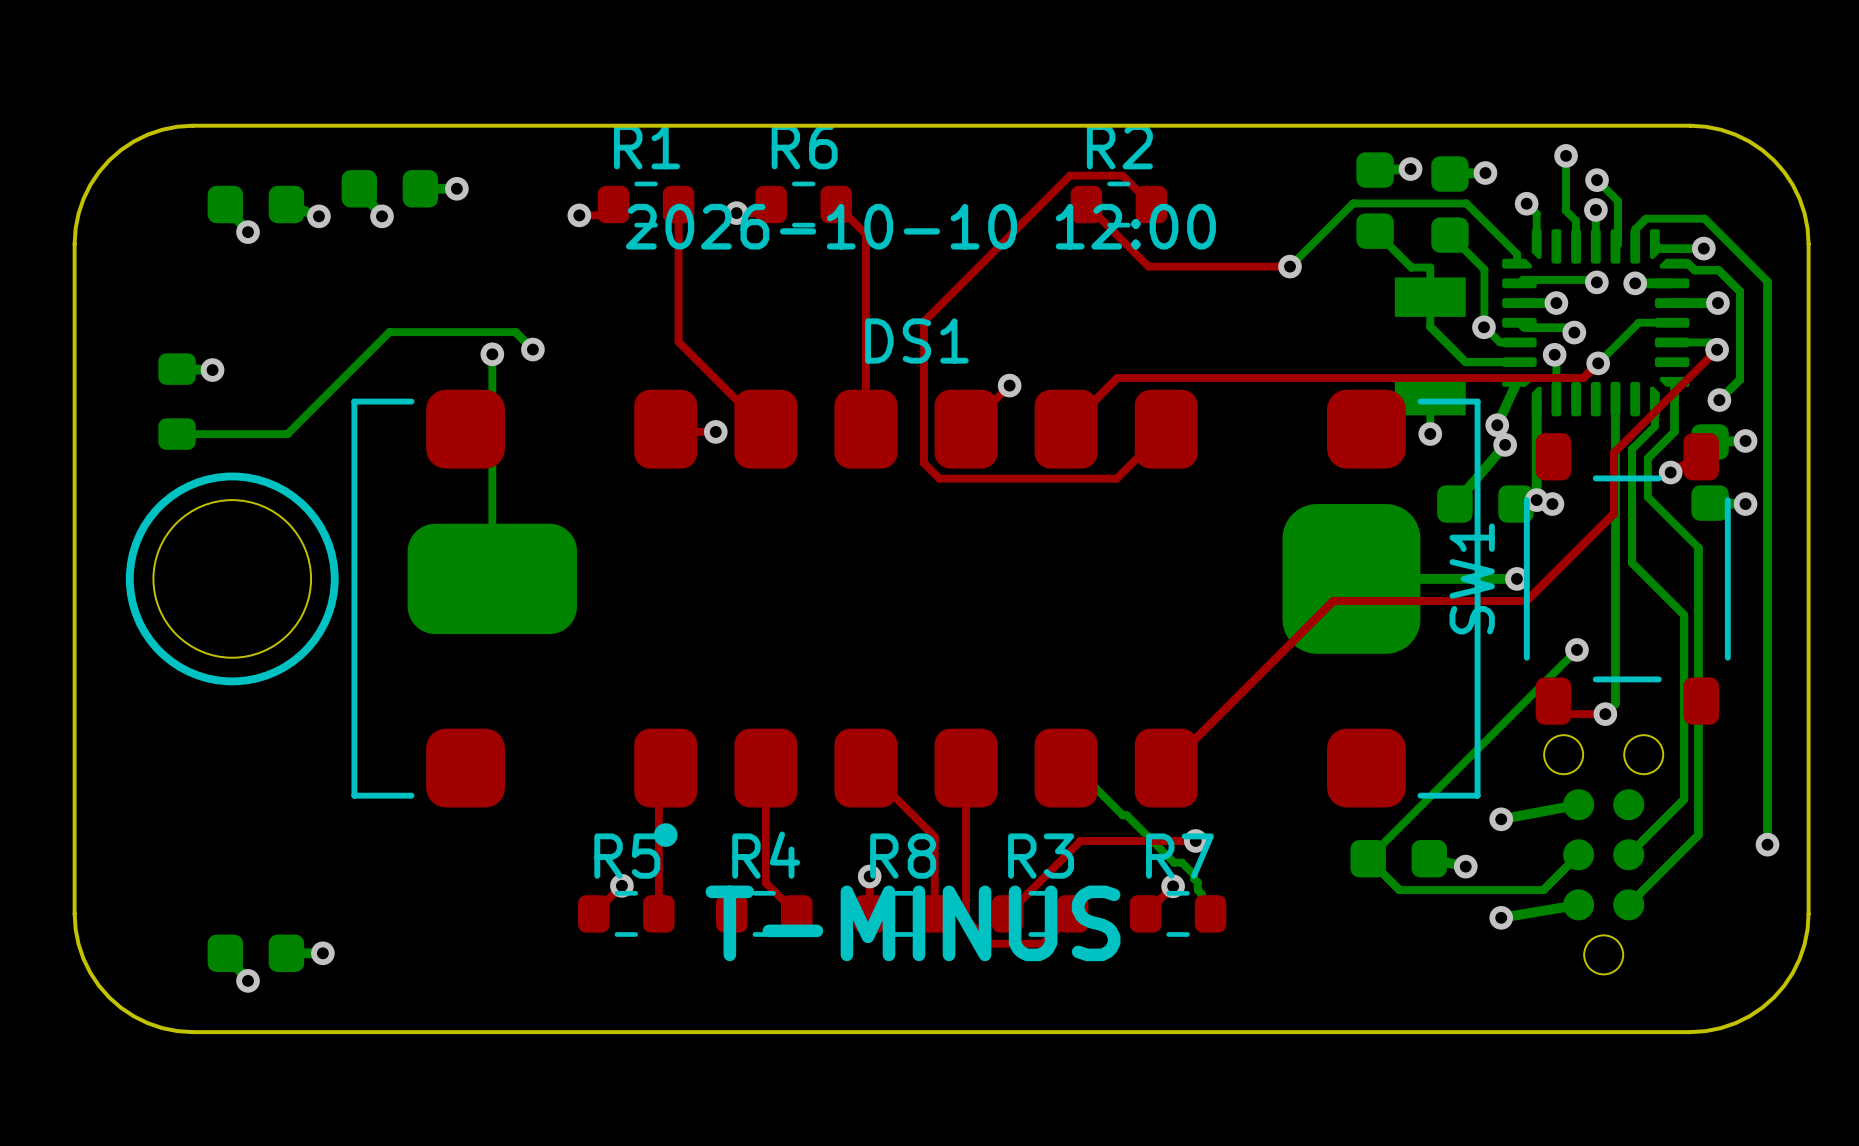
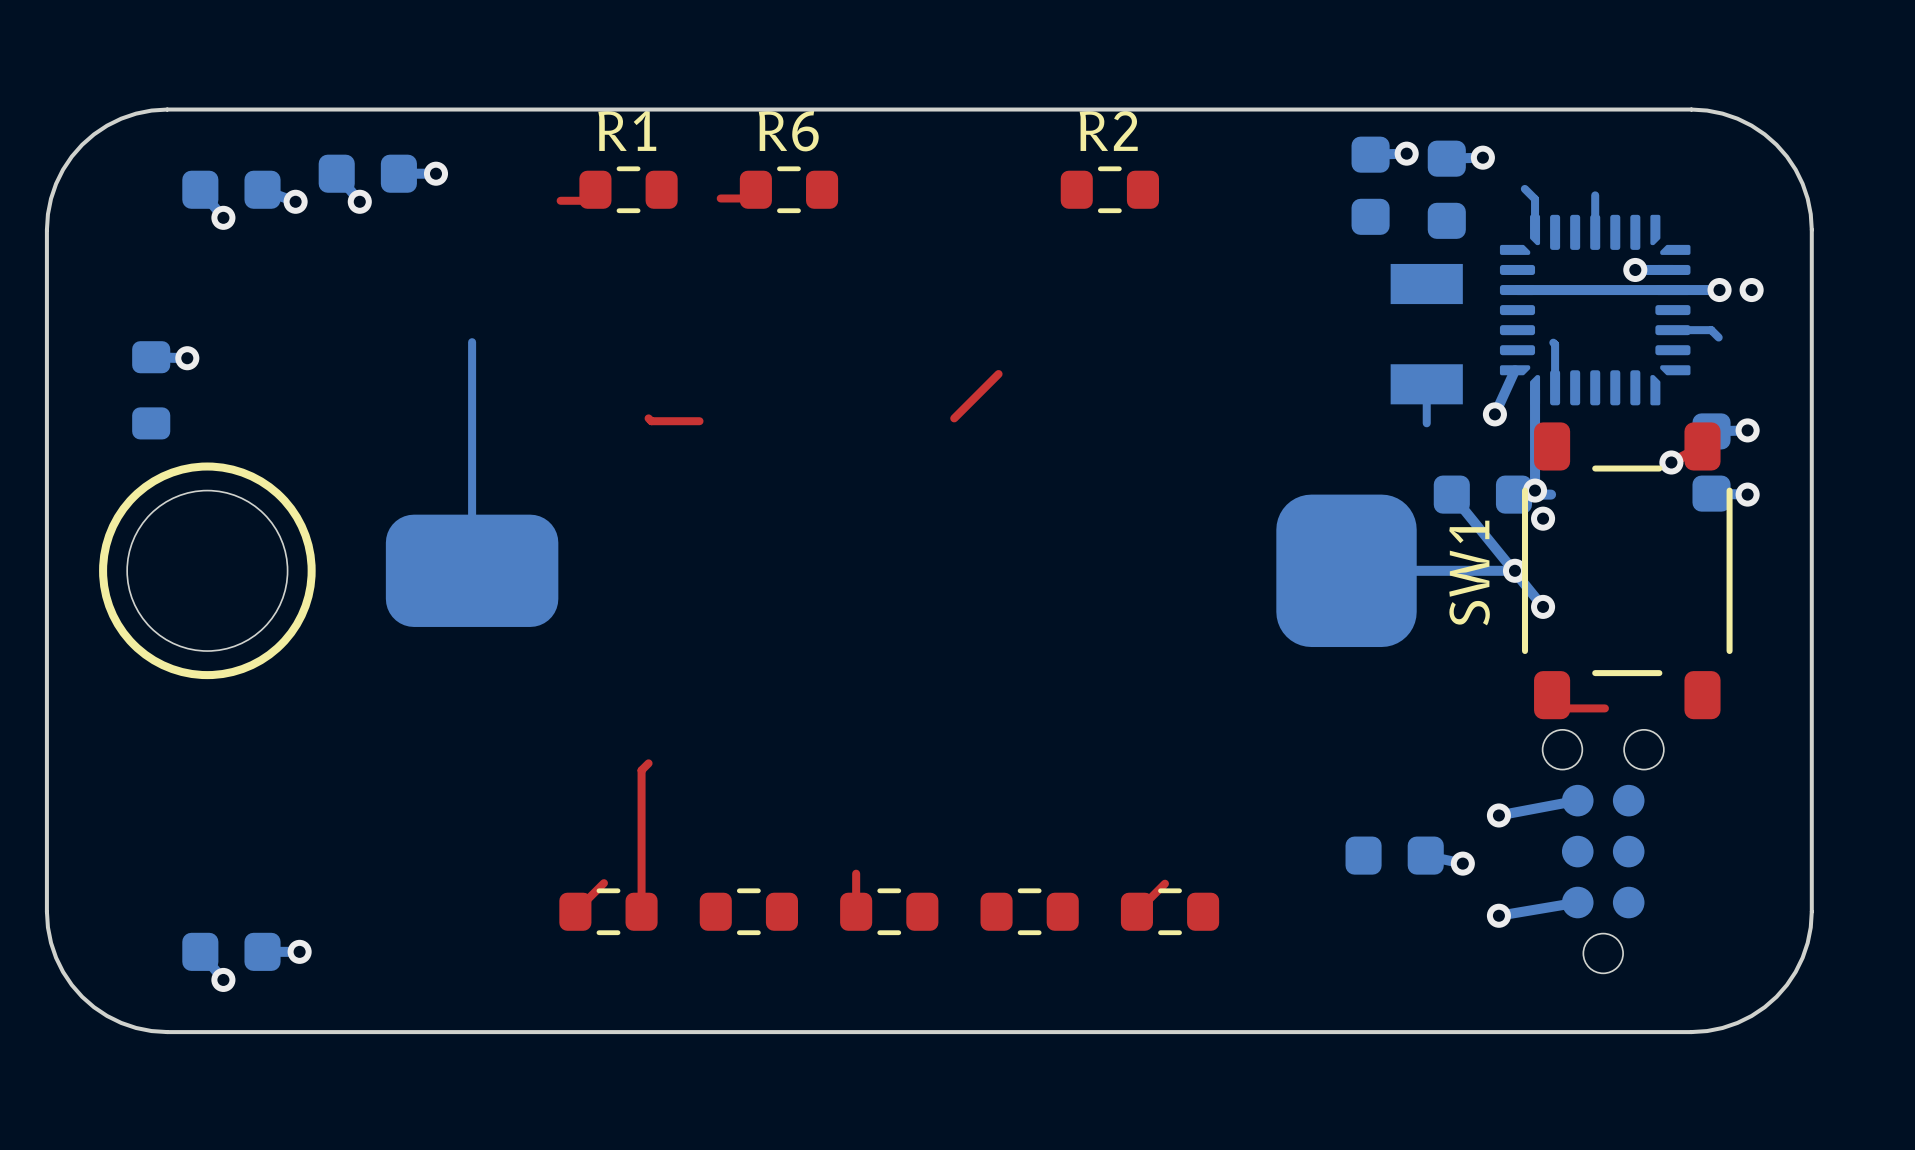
bottom track: (1566, 155) (1566, 210) (1576, 220) (1576, 246) -> none
via: (1566, 155) -> none
bottom track: (1597, 180) (1617, 201) (1617, 243) (1615, 246) -> none
via: (1597, 180) -> none
via: (1526, 203) -> none
top track: (678, 204) (678, 341) (765, 429) -> none
top track: (836, 204) (865, 234) (865, 429) -> none
top track: (1086, 204) (1148, 266) (1290, 266) -> none
top track: (1151, 204) (1122, 175) (1069, 175) (924, 321) (924, 463) (939, 478) (1116, 478) (1166, 429) -> none
via: (1595, 209) -> none
via: (736, 213) -> none
via: (579, 215) -> none
text: 2026-10-10 12:00 (920, 226) -> none
bottom track: (1375, 231) (1411, 267) (1430, 267) (1430, 326) (1465, 362) (1519, 362) -> none
bottom track: (1449, 235) (1484, 269) (1484, 326) (1500, 342) (1519, 342) -> none
bottom track: (1654, 244) (1659, 248) (1703, 248) -> none
bottom track: (1635, 246) (1635, 229) (1646, 218) (1704, 218) (1767, 281) (1767, 844) -> none
via: (1703, 248) -> none
bottom track: (1517, 263) (1517, 254) (1466, 203) (1353, 203) (1290, 266) -> none
bottom track: (1674, 263) (1688, 263) (1694, 270) (1718, 270) (1739, 291) (1739, 379) (1719, 400) -> none
via: (1290, 266) -> none
bottom track: (1596, 282) (1594, 279) (1522, 279) (1519, 283) -> none
via: (1596, 282) -> none
bottom track: none -> (1555, 290) (1672, 290)
via: (1556, 303) -> none
via: none -> (1751, 290)
bottom track: (1519, 322) (1524, 327) (1569, 327) (1574, 332) -> none
bottom track: (1672, 322) (1638, 322) (1598, 363) -> none
via: (1483, 327) -> none
via: (1574, 332) -> none
bottom track: (532, 349) (515, 332) (389, 332) (287, 434) (177, 434) -> none
via: (532, 349) -> none
top track: (1717, 349) (1613, 452) (1613, 513) (1526, 600) (1333, 600) (1166, 768) -> none
via: (1717, 349) -> none
via: (492, 354) -> none
via: (1554, 354) -> none
top track: (1598, 363) (1583, 377) (1117, 377) (1066, 429) -> none
via: (1598, 363) -> none
bottom track: (1674, 381) (1674, 431) (1647, 458) (1647, 497) (1698, 547) (1698, 835) (1628, 904) -> none
via: (1009, 385) -> none
bottom track: (1615, 399) (1615, 703) (1605, 714) -> none
via: (1719, 400) -> none
bottom track: (1654, 401) (1654, 426) (1632, 449) (1632, 563) (1684, 615) (1684, 799) (1628, 854) -> none
via: (715, 431) -> none
via: (1430, 433) -> none
bottom track: (1505, 444) (1454, 504) -> (1543, 606) (1451, 494)
via: (1505, 444) -> none
via position: (1552, 504) -> (1543, 518)
DS1: (915, 618) -> none
bottom track: (1577, 649) (1368, 858) (1399, 890) (1543, 890) (1578, 854) -> none
via position: (1577, 649) -> (1543, 606)
via: (1605, 714) -> none
top track: (765, 768) (765, 882) (796, 913) -> none
top track: (865, 768) (934, 836) (934, 913) -> none
top track: (966, 768) (966, 919) (990, 943) (1042, 943) (1072, 913) -> none
bottom track: (1066, 768) (1087, 787) (1095, 787) (1122, 815) (1126, 815) (1174, 862) (1182, 862) (1193, 874) (1193, 878) (1197, 882) (1197, 890) (1205, 902) (1205, 909) (1210, 913) -> none
top track: (1195, 840) (1080, 840) (1007, 913) -> none
via: (1195, 840) -> none
via: (1767, 844) -> none
R4 name: R4 (766, 855) -> none
R5 name: R5 (627, 856) -> none
R8 name: R8 (903, 856) -> none
R3 name: R3 (1041, 856) -> none
R7 name: R7 (1179, 856) -> none
via: (869, 876) -> none
via: (621, 885) -> none
via: (1173, 886) -> none
text: T-MINUS (912, 923) -> none

